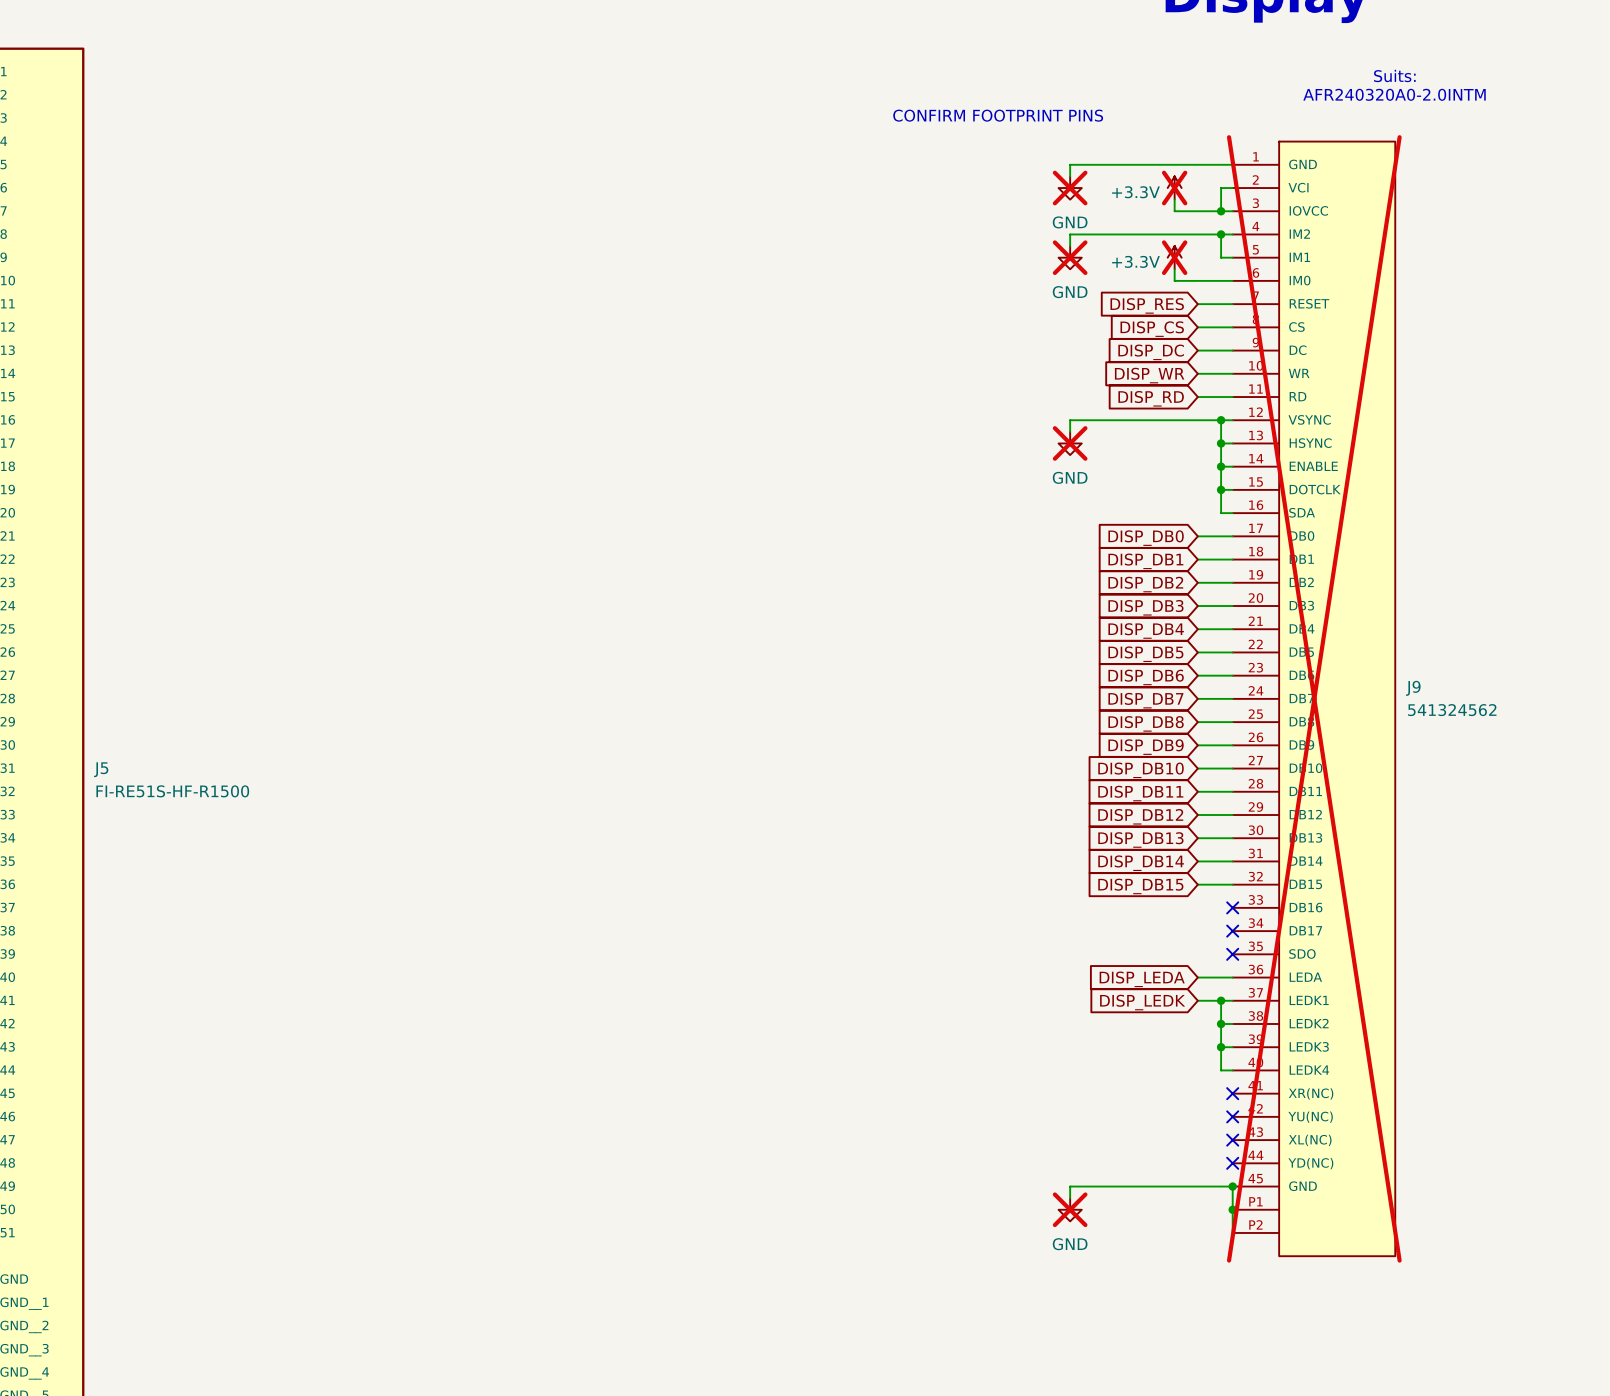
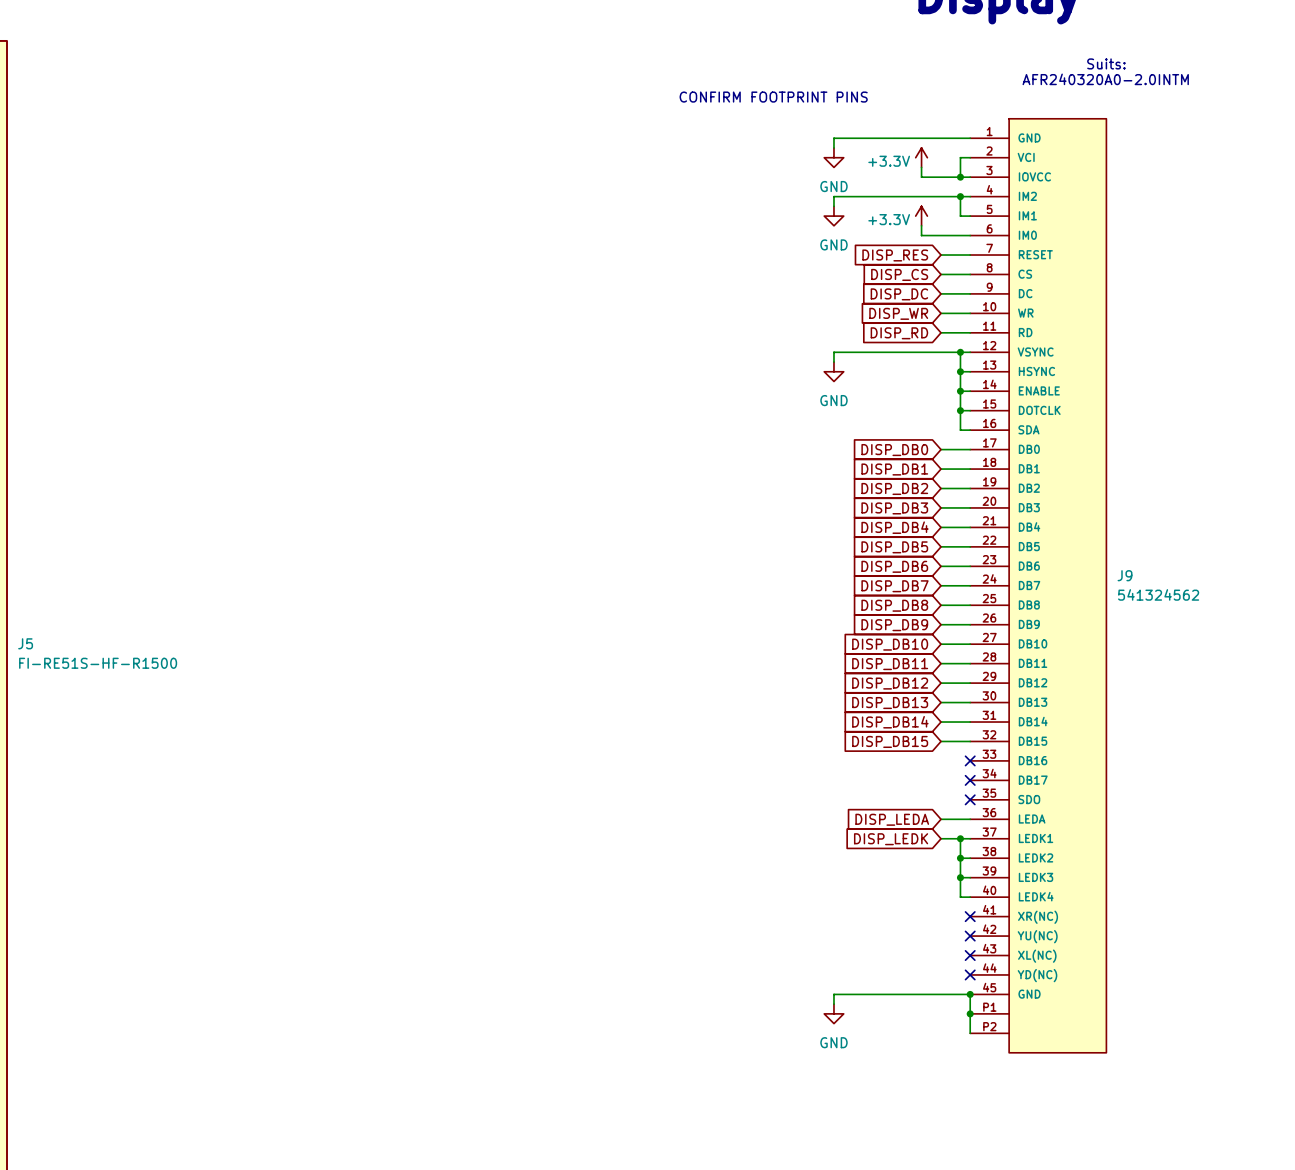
power symbol do-not-place cross: (1070, 188) -> none
power symbol do-not-place cross: (1174, 188) -> none
power symbol do-not-place cross: (1070, 257) -> none
power symbol do-not-place cross: (1174, 257) -> none
power symbol do-not-place cross: (1070, 443) -> none
J9 do-not-place cross: (1314, 698) -> none
power symbol do-not-place cross: (1070, 1209) -> none

